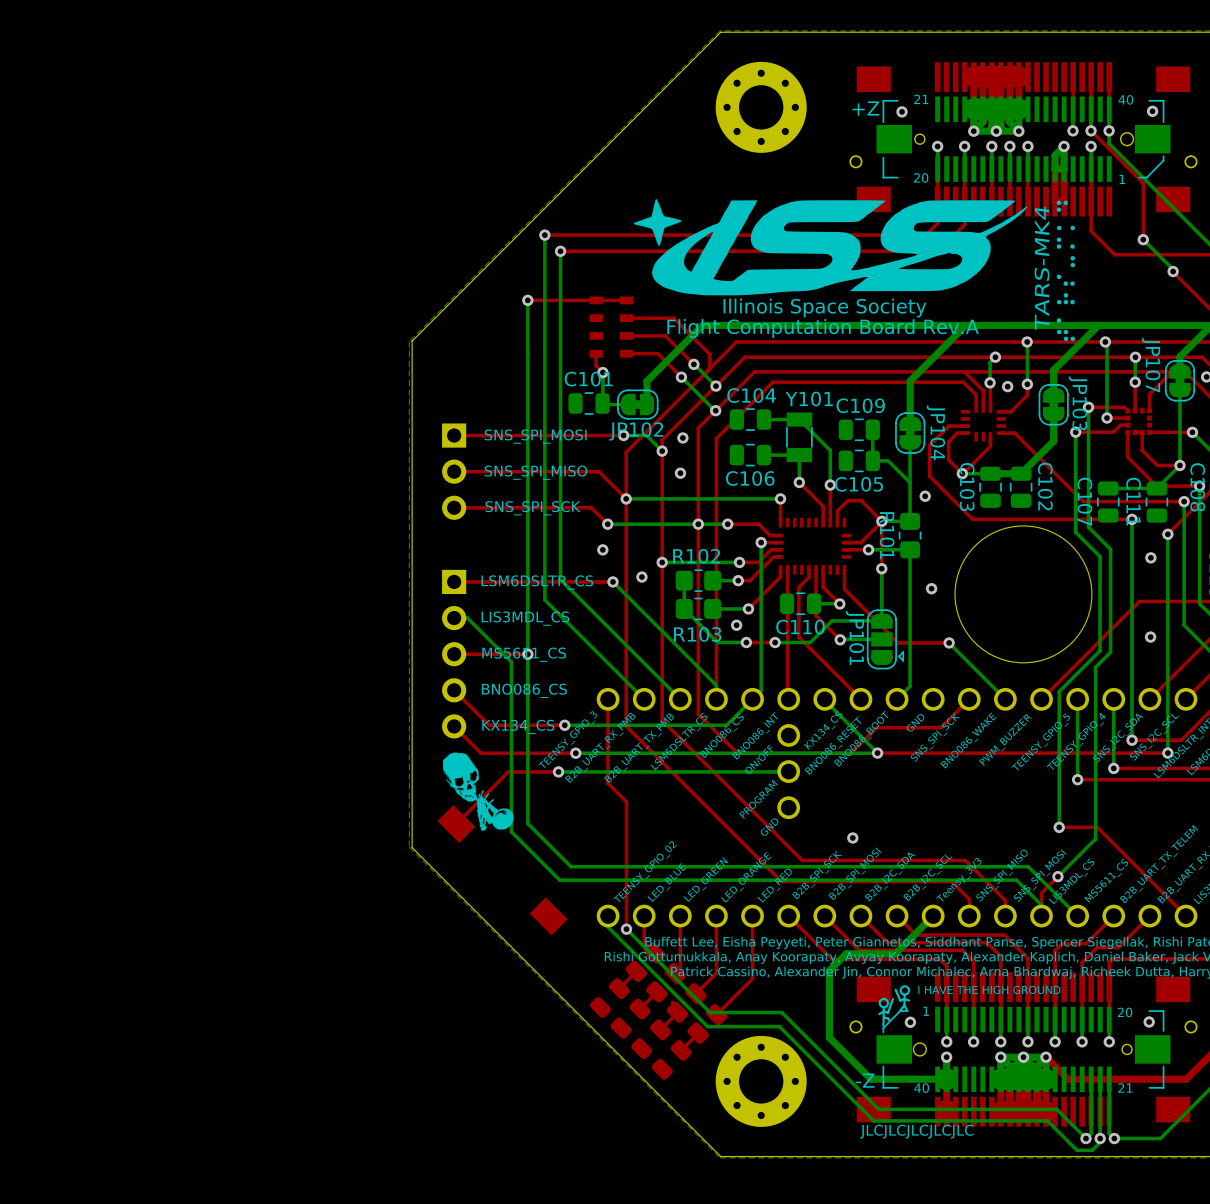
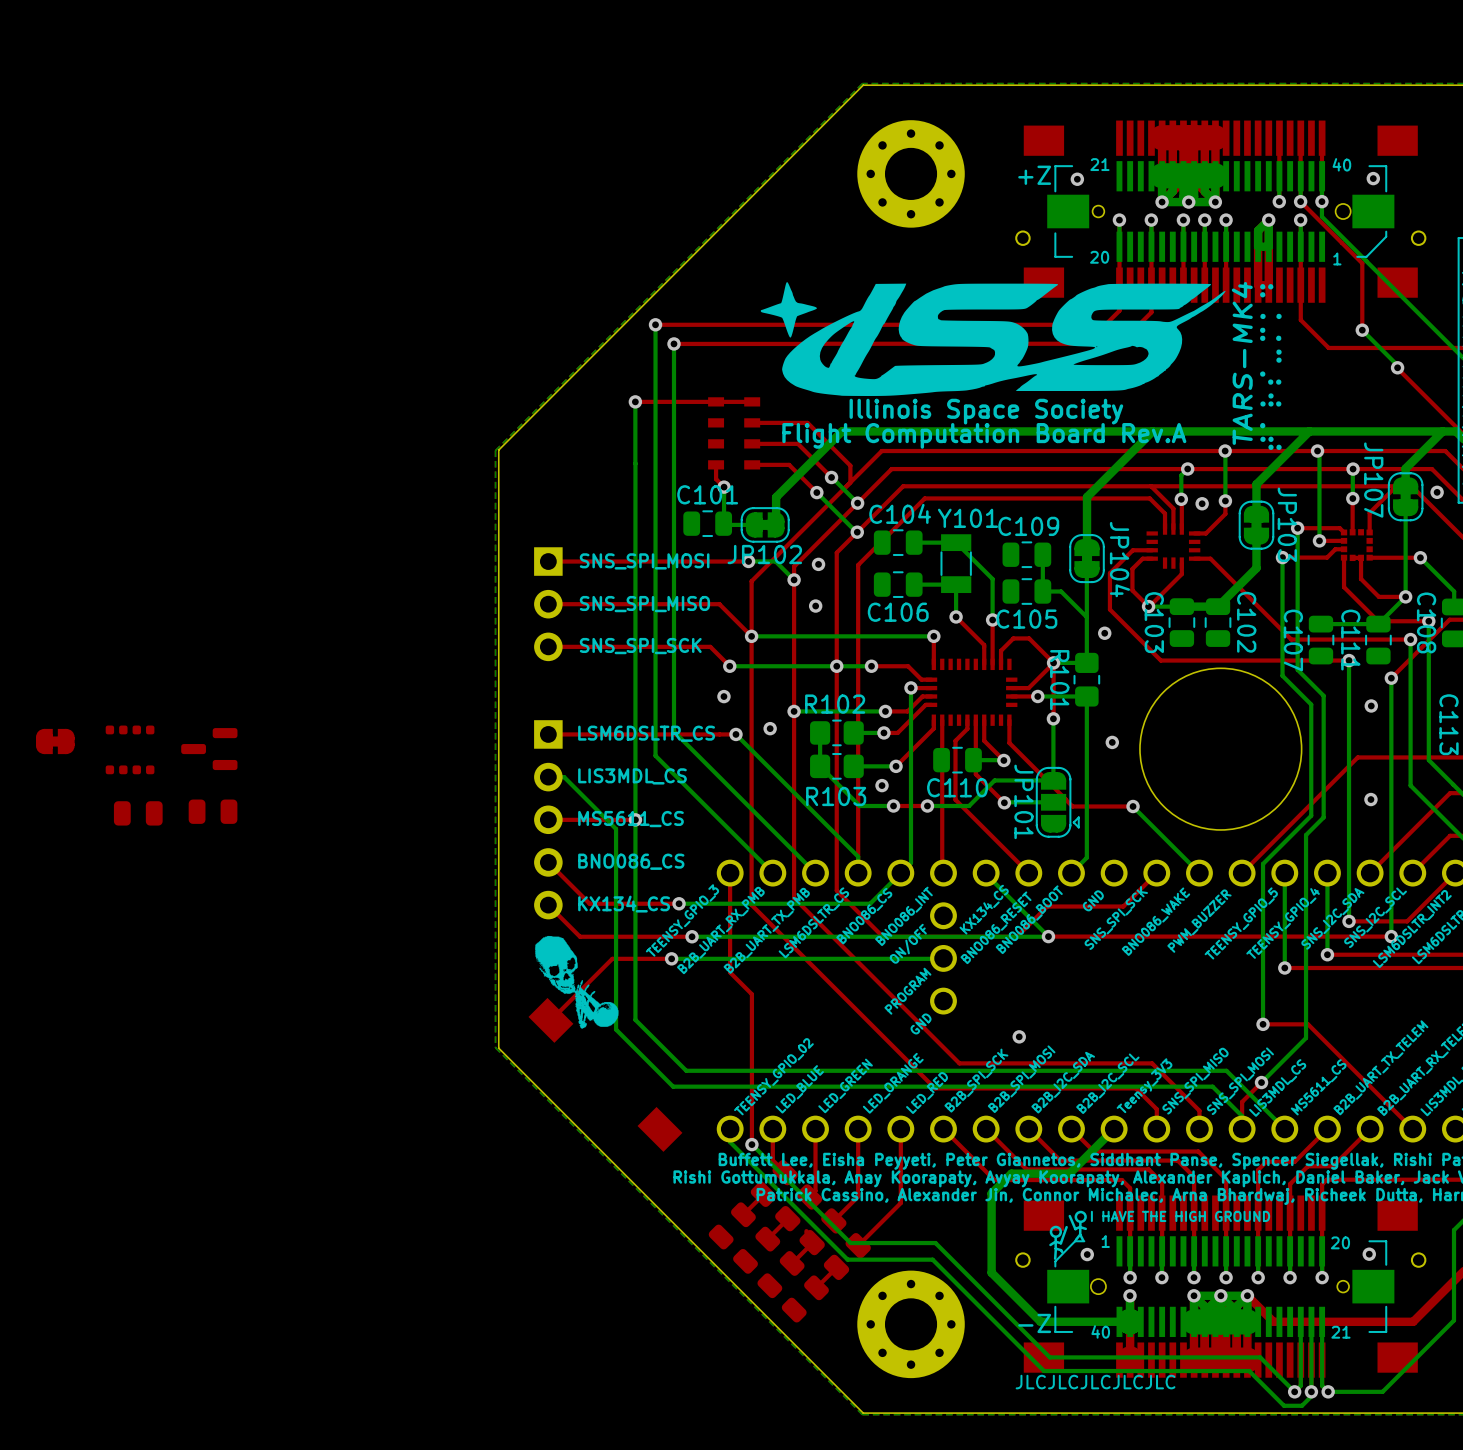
part: none -> (55, 741)
part: none -> (209, 749)
part: none -> (130, 749)
part: none -> (213, 811)
part: none -> (138, 813)

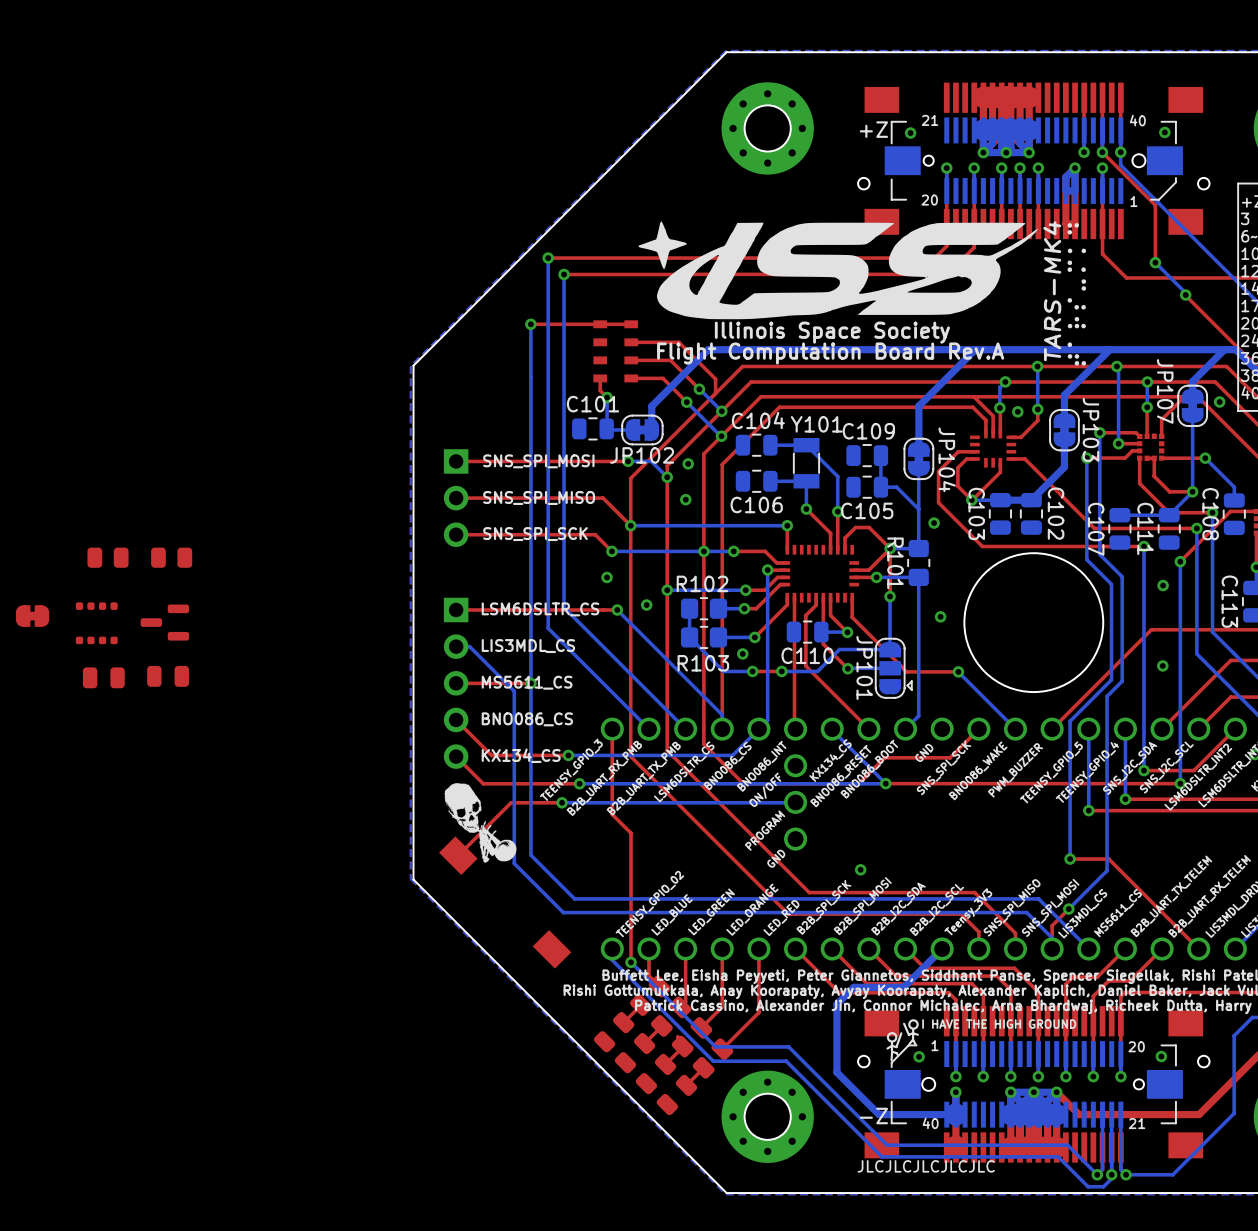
part: none -> (108, 557)
part: none -> (171, 557)

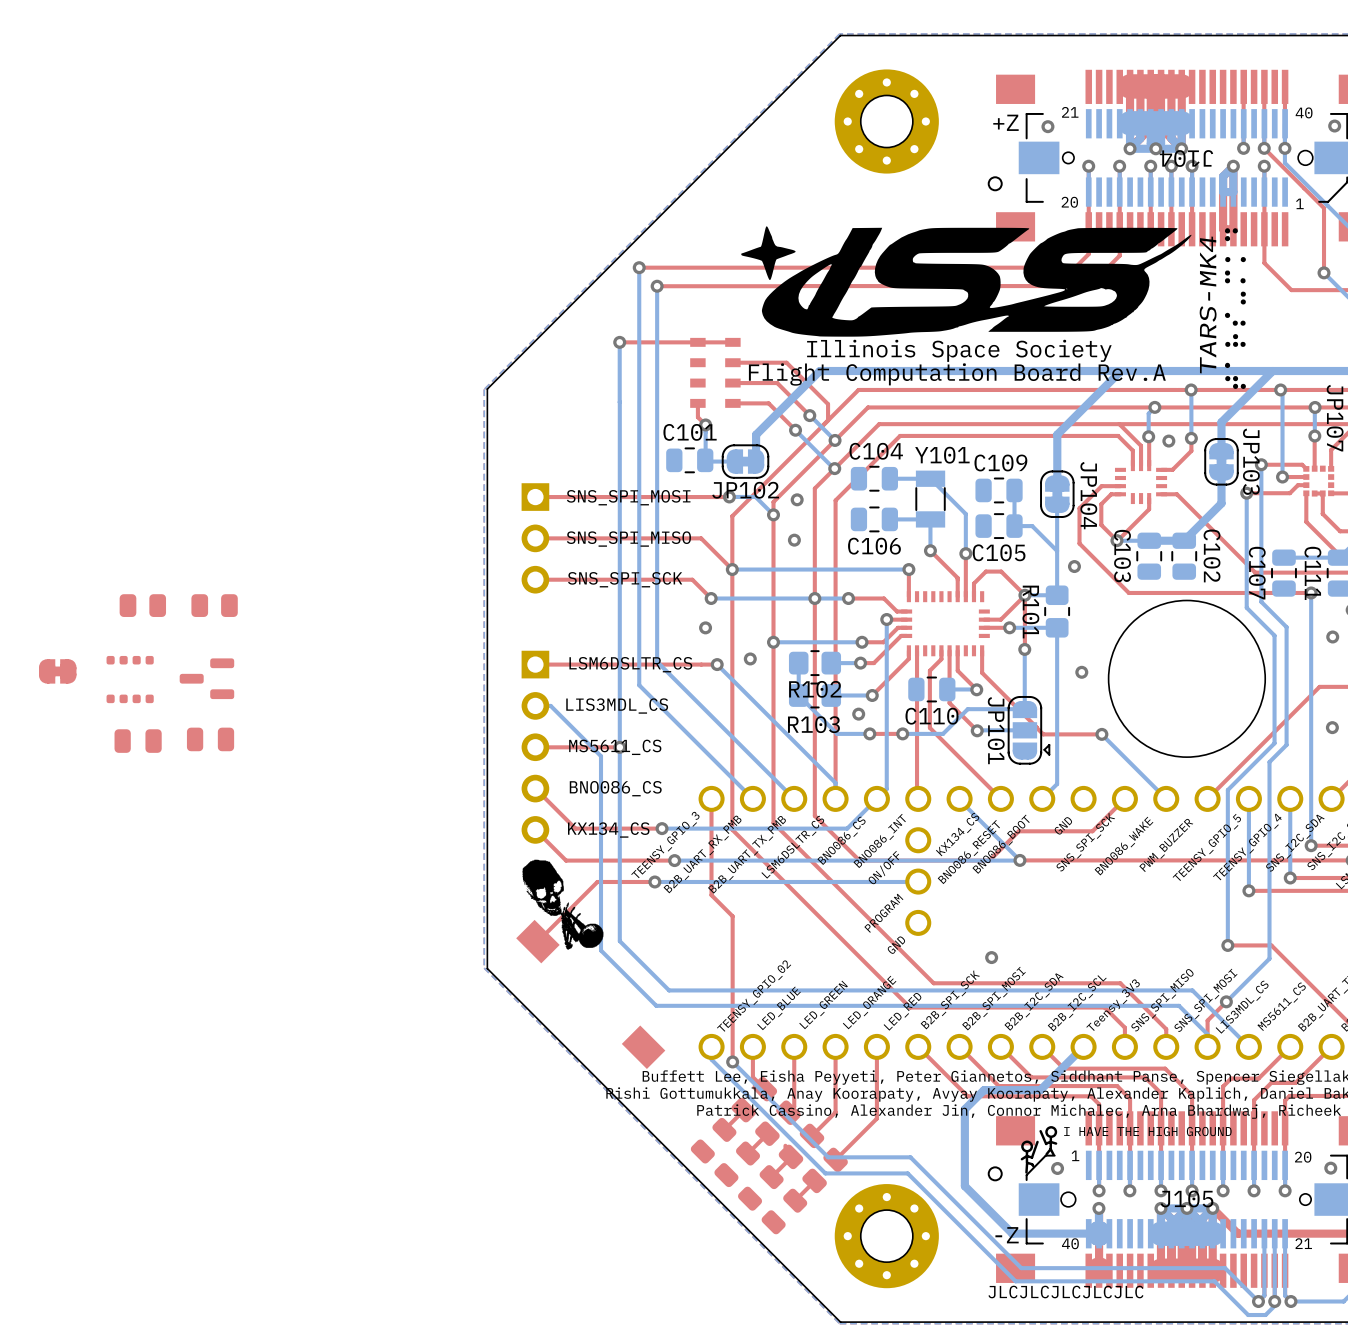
J104 name: none -> J104 (1186, 158)
R102 name position: R102 (702, 583) -> R102 (815, 689)
J105 name: none -> J105 (1187, 1198)

